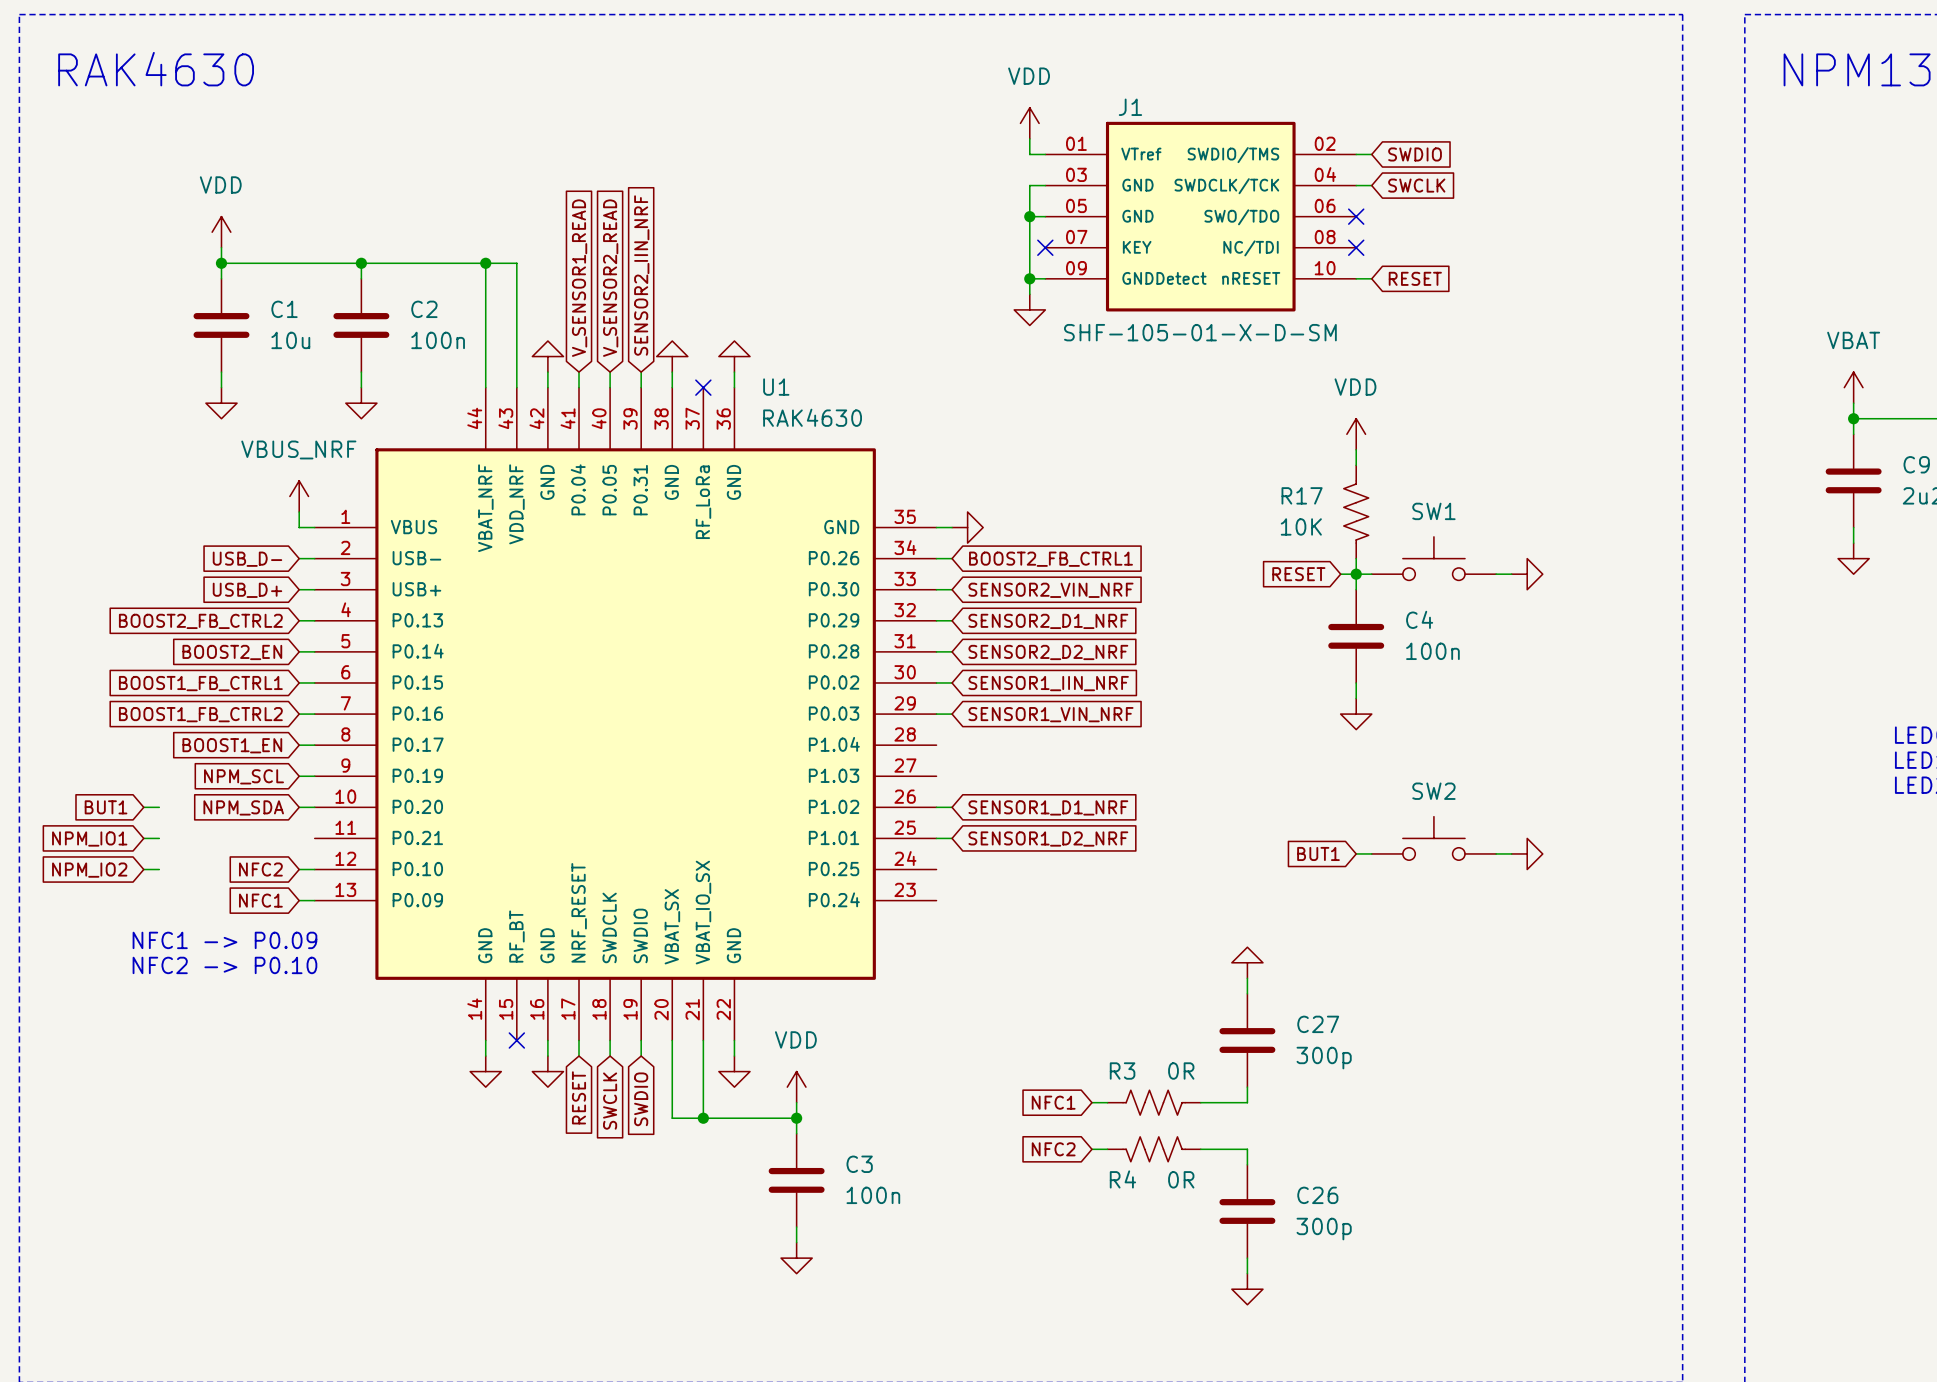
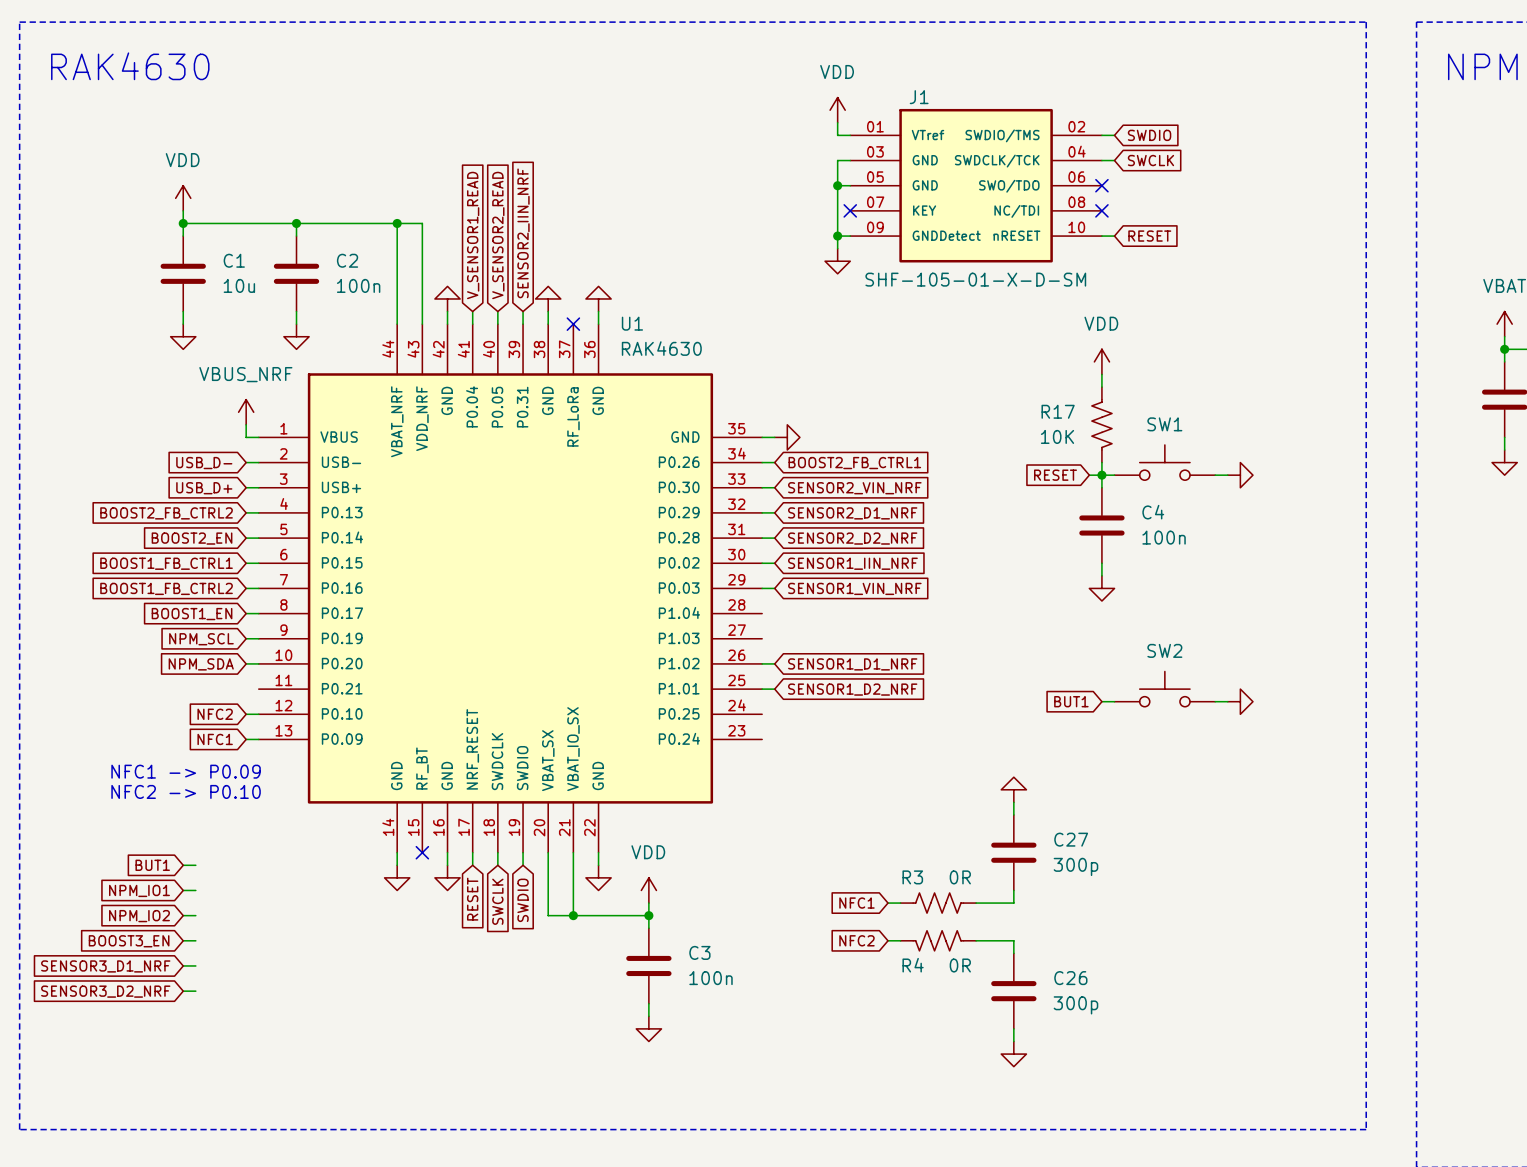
global label position: BUT1 (106, 807) -> BUT1 (152, 865)
wire: (143, 807) (159, 807) -> (183, 865) (195, 865)
wire: (143, 838) (159, 838) -> (183, 890) (195, 890)
global label position: NPM_IO1 (89, 839) -> NPM_IO1 (139, 890)
wire: (143, 869) (159, 869) -> (183, 915) (195, 915)
global label position: NPM_IO2 (89, 870) -> NPM_IO2 (139, 916)
global label: none -> BOOST3_EN (129, 941)
wire: none -> (183, 940) (195, 940)
global label: none -> SENSOR3_D1_NRF (105, 966)
wire: none -> (183, 965) (195, 965)
wire: none -> (183, 991) (195, 991)
global label: none -> SENSOR3_D2_NRF (105, 991)

